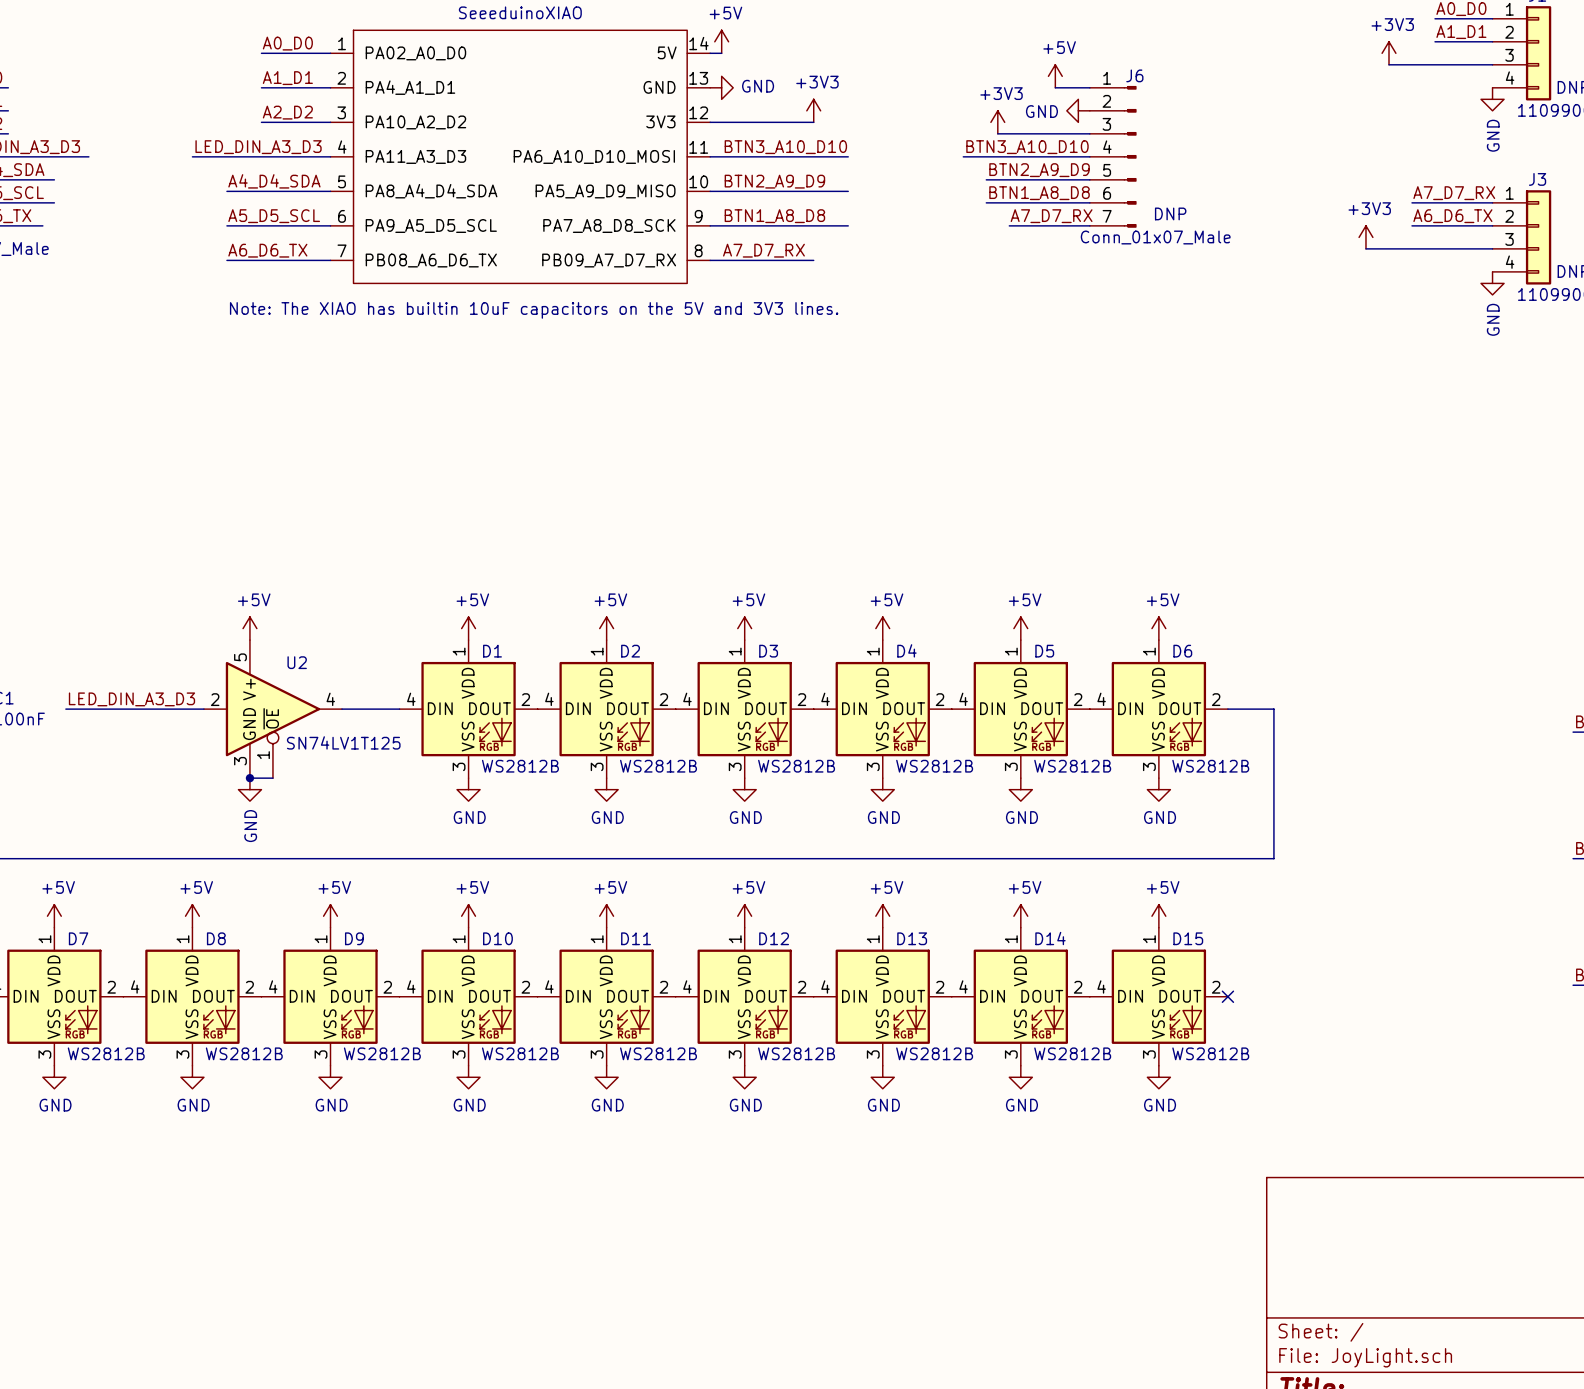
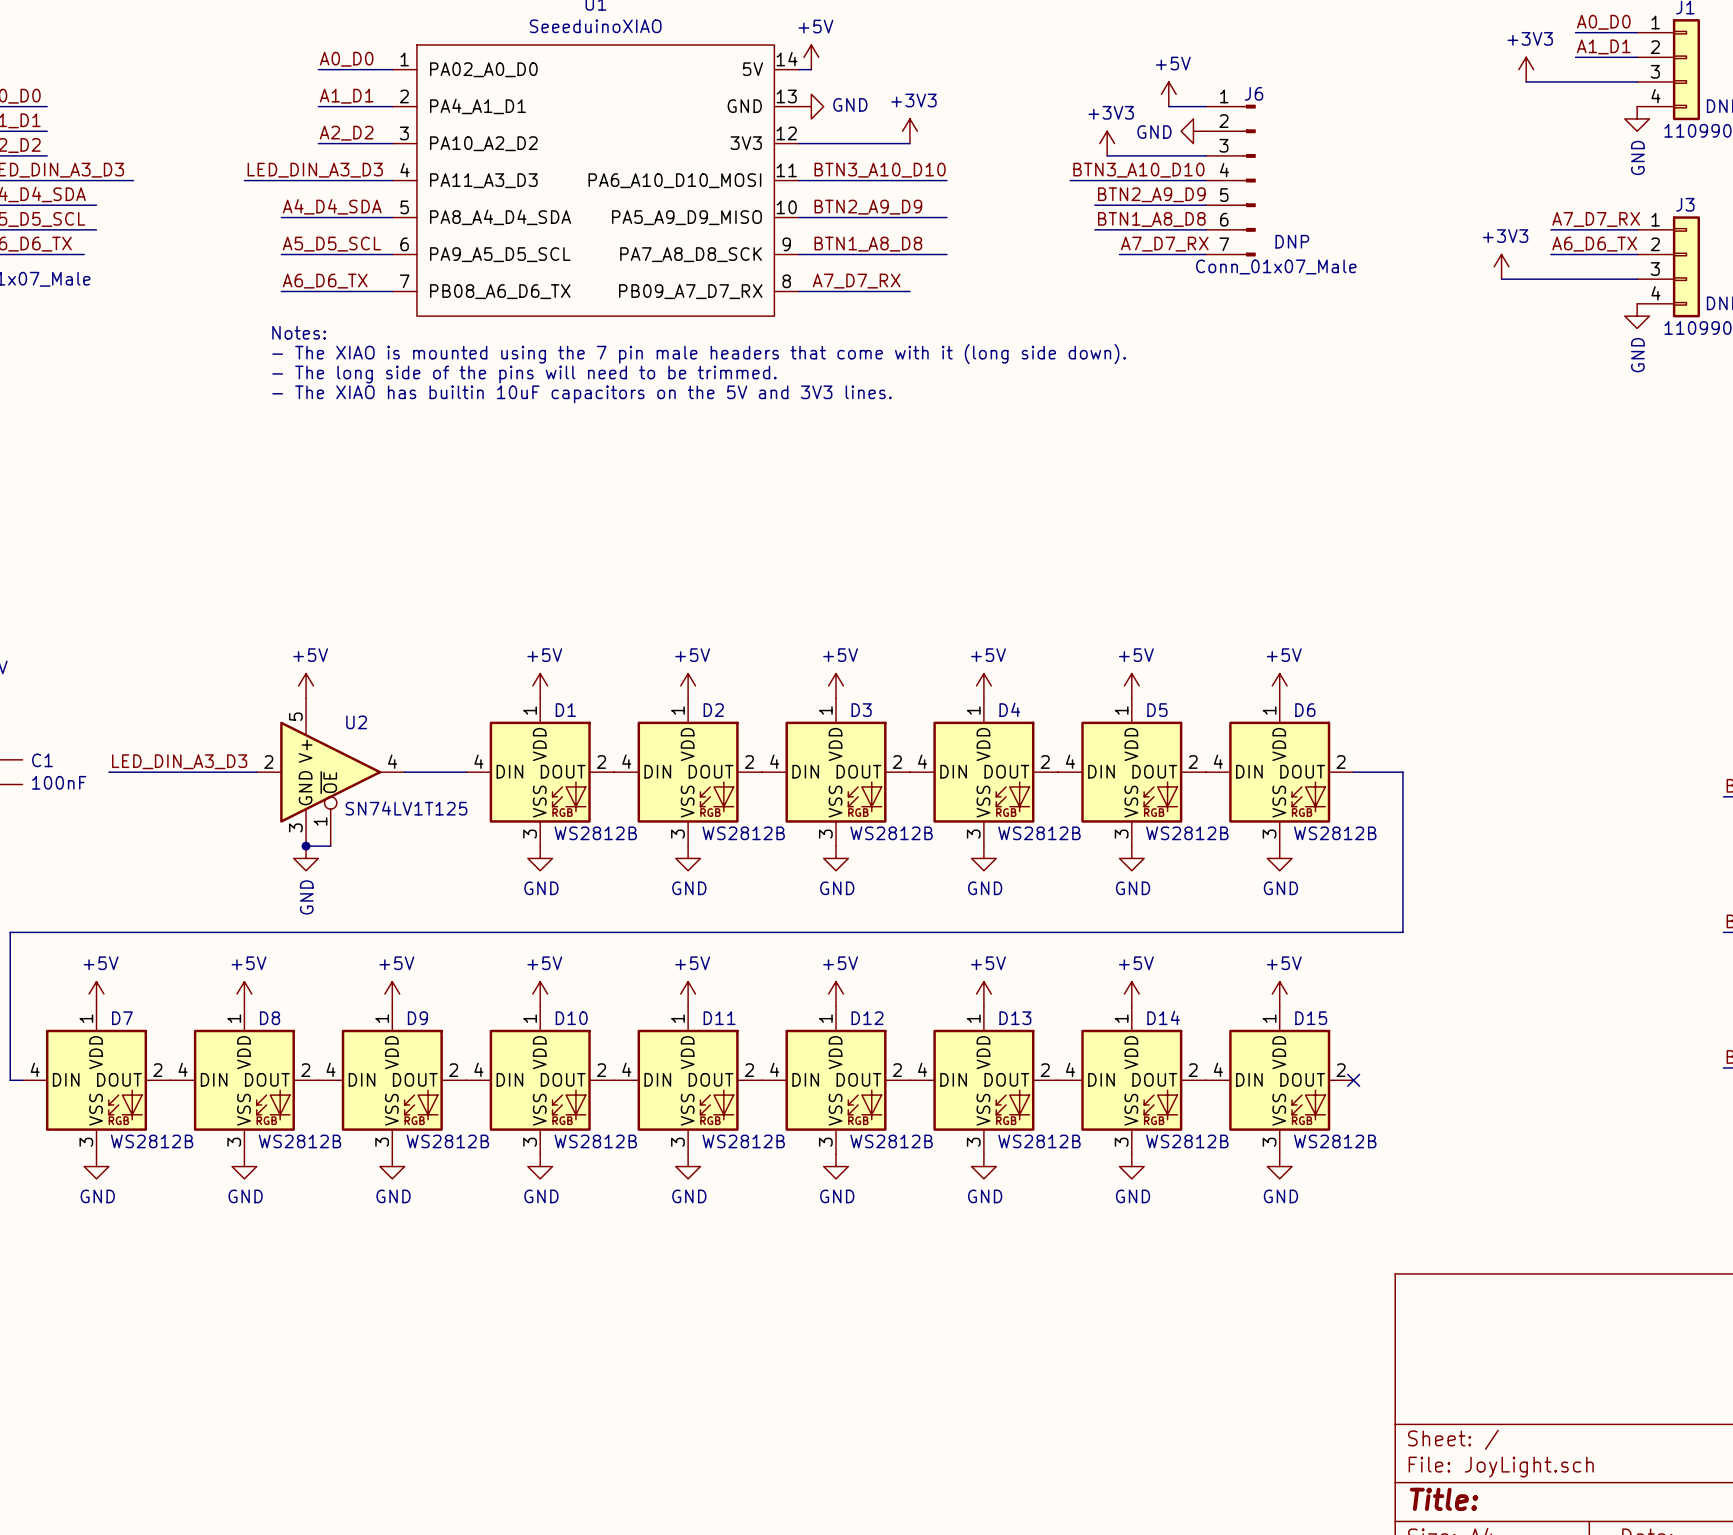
text: none -> Notes: (299, 332)
text: Note: The XIAO has builtin 10uF capacitors on the 5V and 3V3 lines. (534, 310) -> none
text: none -> - The XIAO is mounted using the 7 pin male headers that come with it (long side down). (699, 354)
text: none -> - The long side of the pins will need to be trimmed. (524, 374)
text: none -> - The XIAO has builtin 10uF capacitors on the 5V and 3V3 lines. (581, 394)

